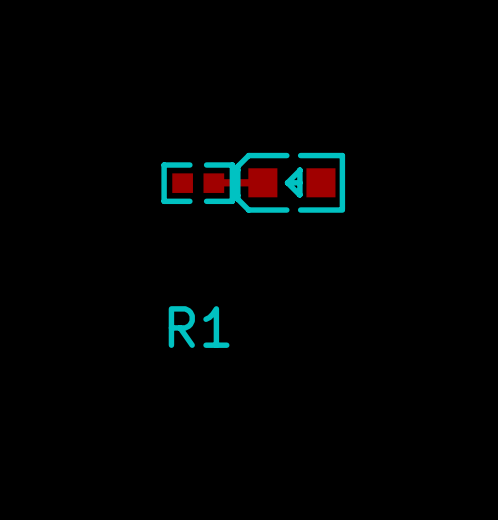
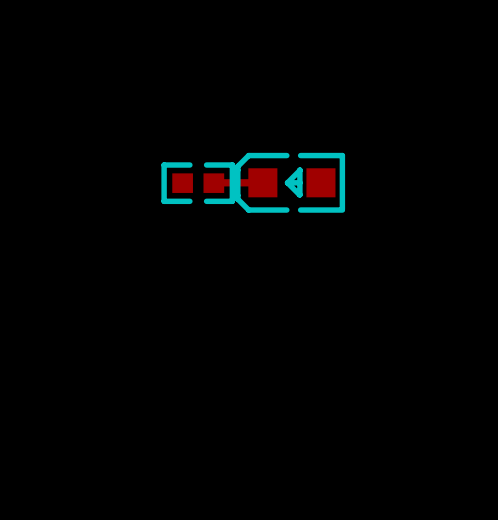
R1 name: R1 (199, 327) -> none

